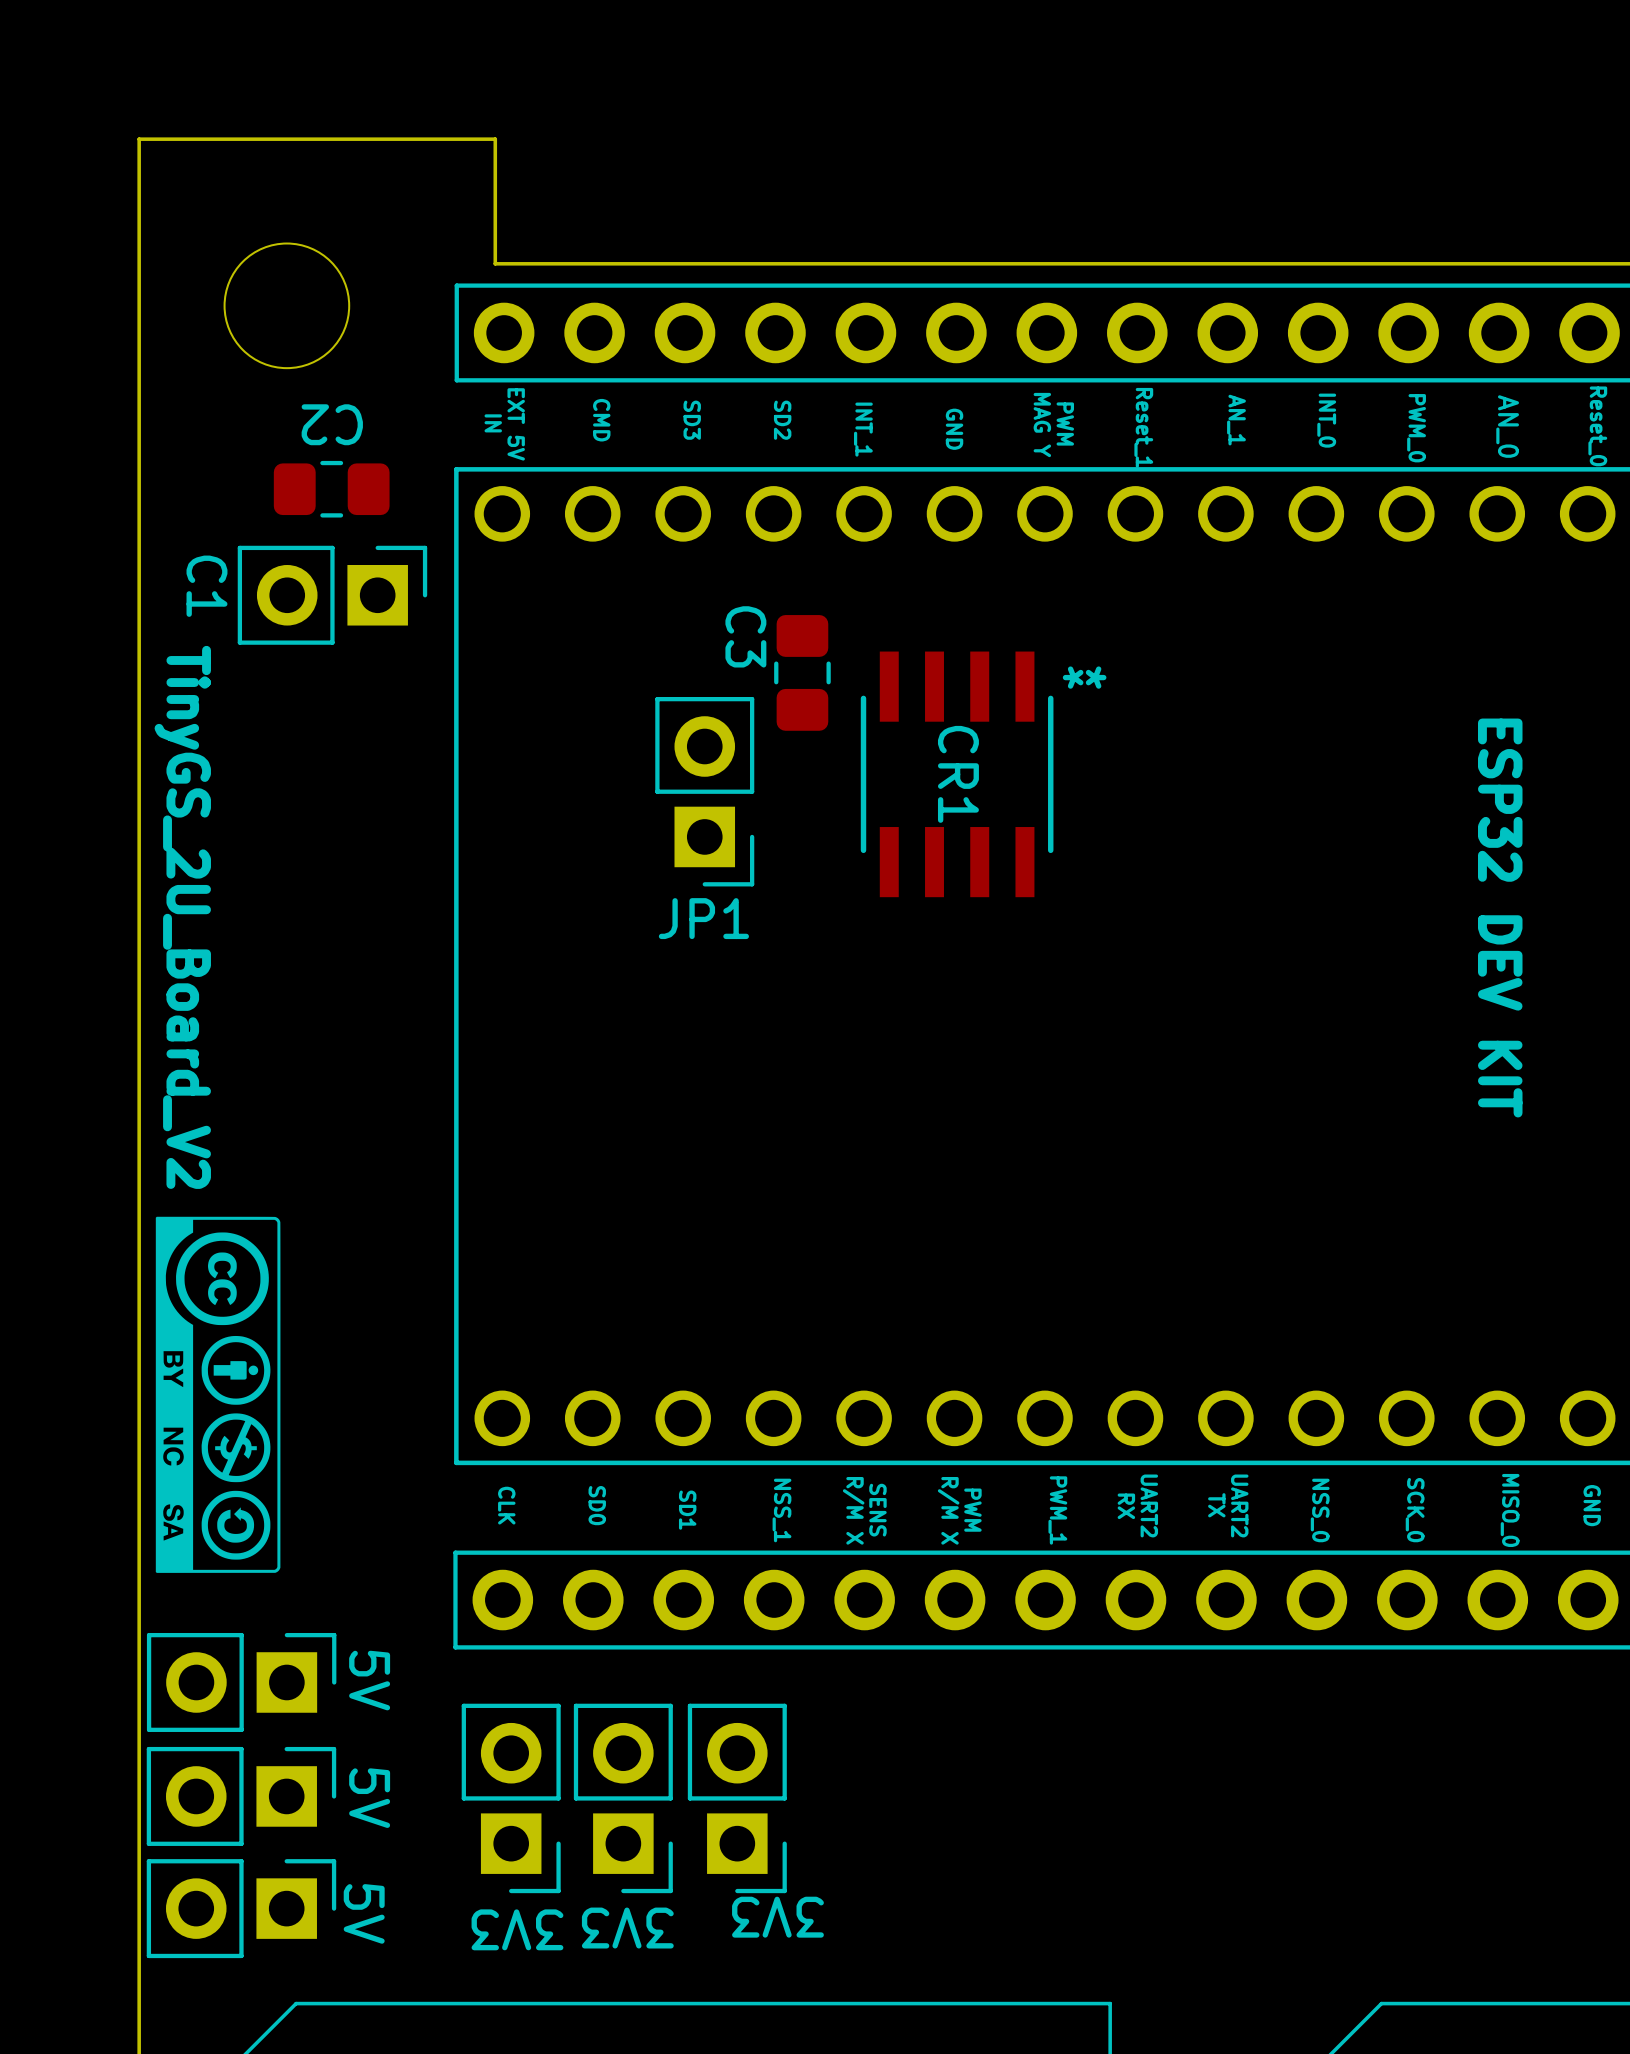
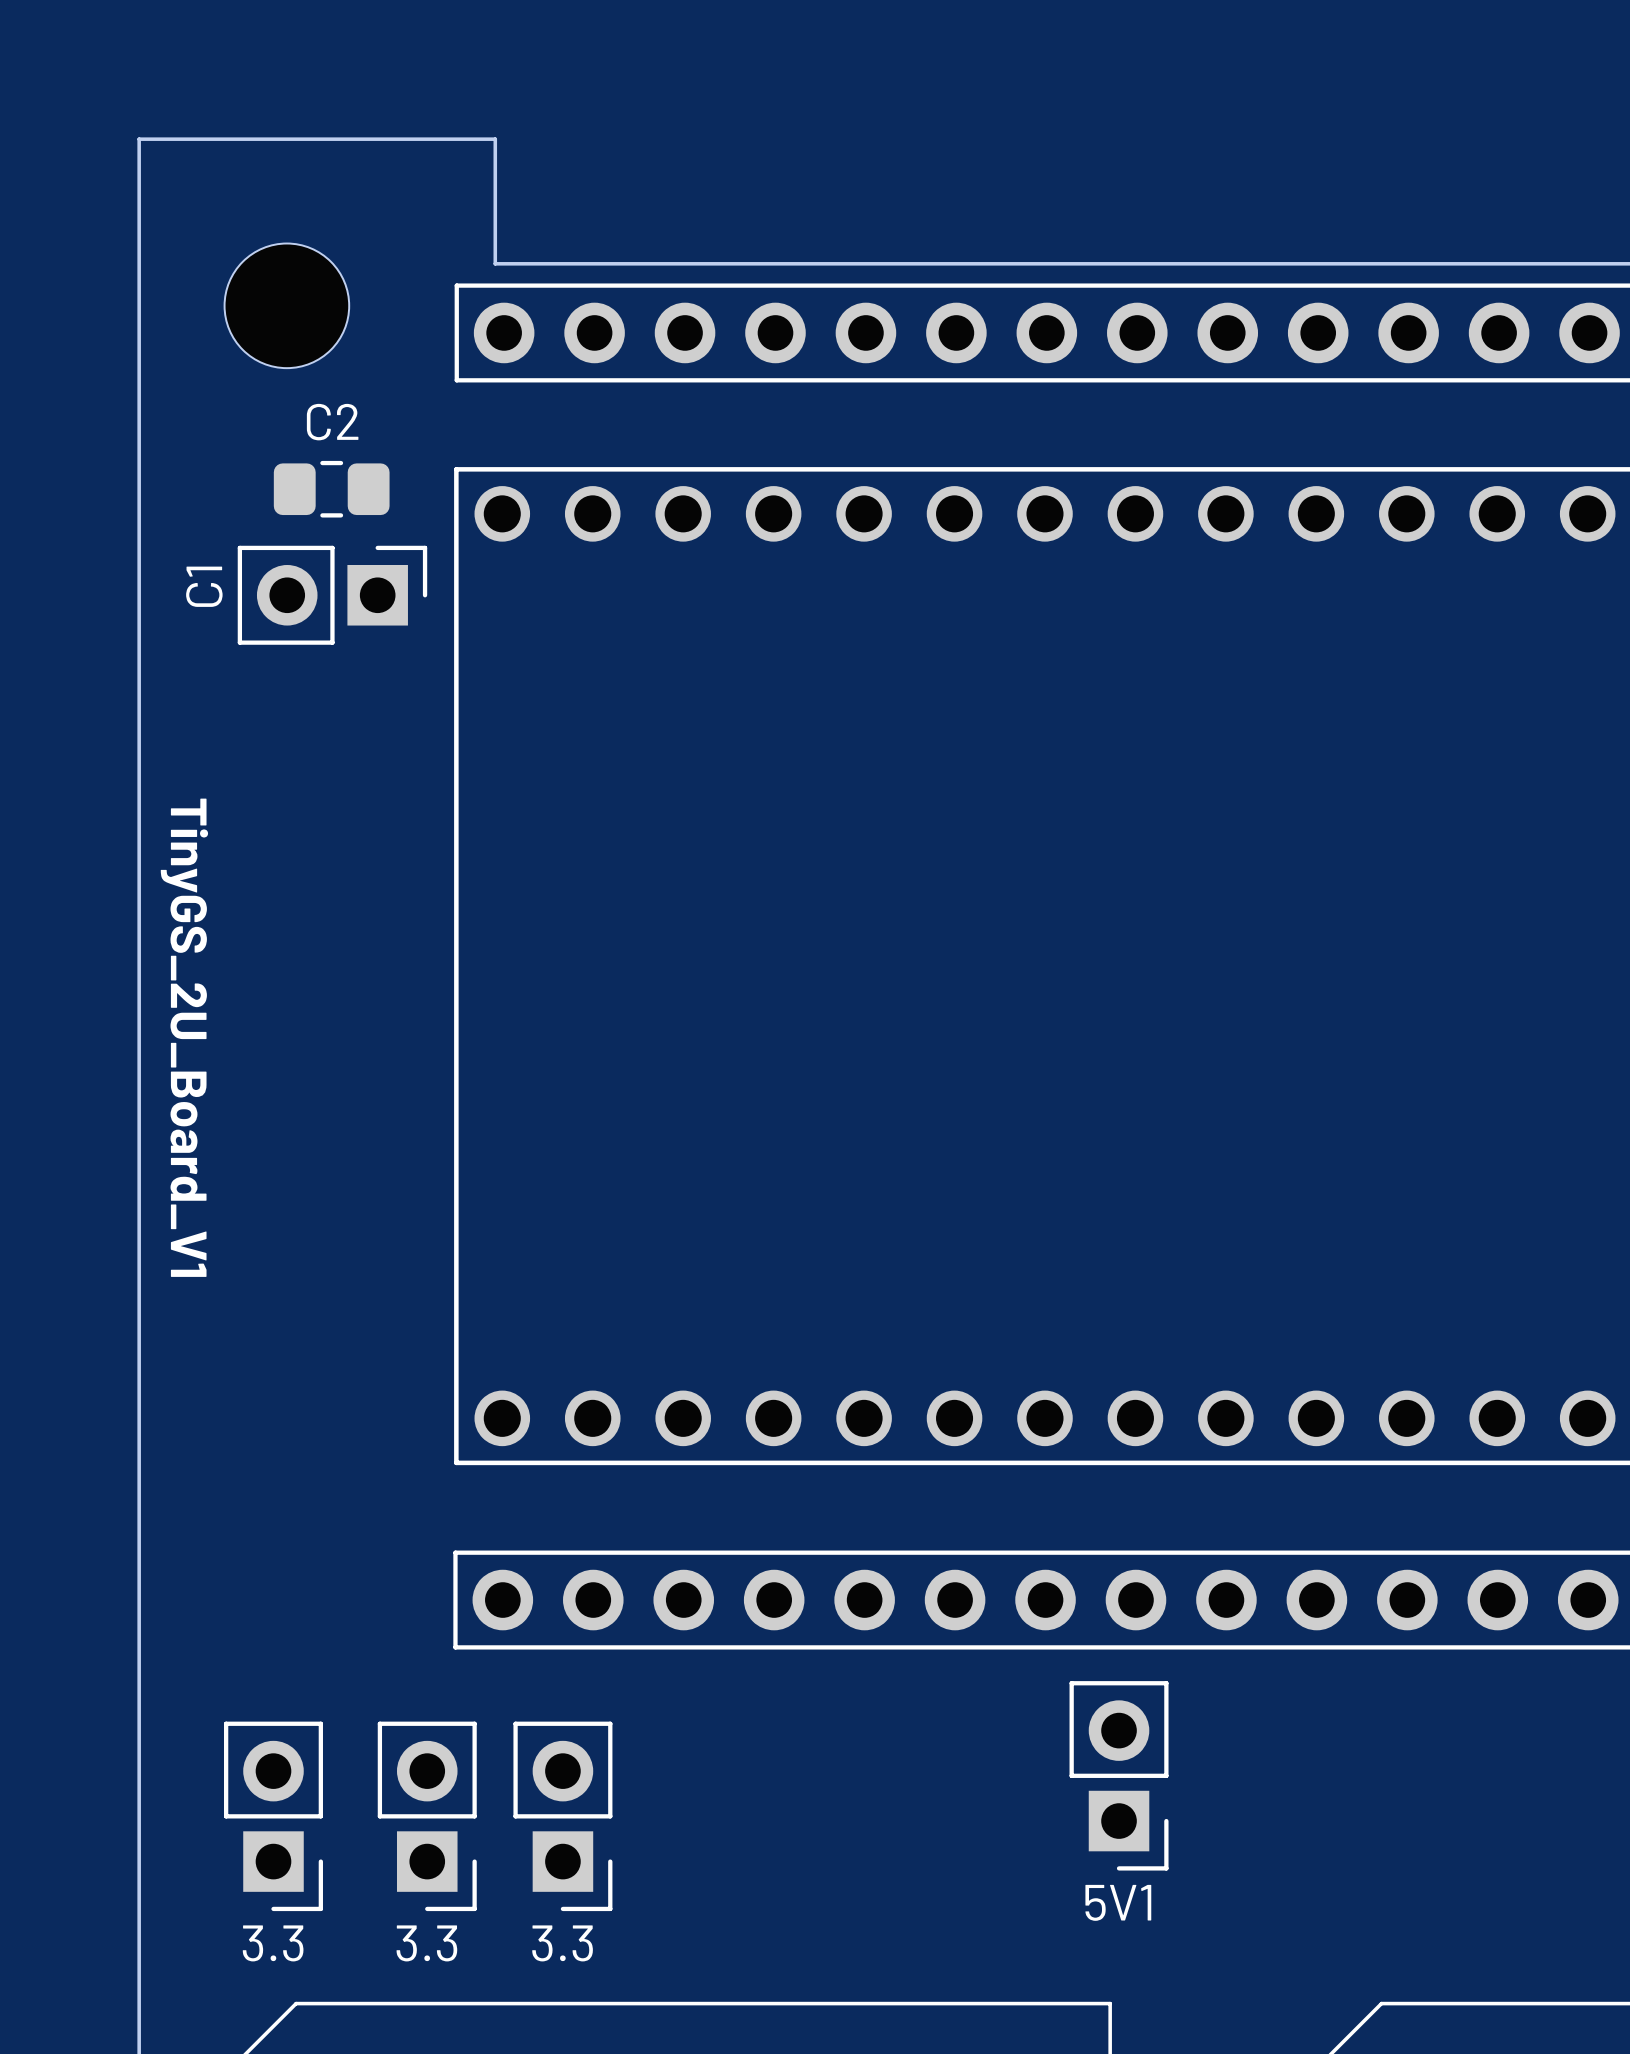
text: CMD (601, 420) -> none
text: SD3 (692, 420) -> none
text: SD2 (782, 420) -> none
text: AN_1 (1236, 420) -> none
text: INT_0 (1326, 420) -> none
text: IN (493, 423) -> none
text: PWM (1065, 423) -> none
C2 name rotation: 0° (332, 424) -> 180° (332, 422)
text: EXT 5V (516, 424) -> none
text: MAG Y (1042, 425) -> none
text: AN_0 (1507, 426) -> none
text: Reset_0 (1597, 426) -> none
text: Reset_1 (1143, 427) -> none
text: PWM_0 (1416, 428) -> none
text: INT_1 (863, 429) -> none
text: GND (954, 429) -> none
C1 name rotation: 0° (206, 586) -> 180° (204, 586)
C3: (802, 672) -> none
CR1: (957, 774) -> none
JP1: (704, 791) -> none
text: TinyGS_2U_Board_V2 (182, 917) -> TinyGS_2U_Board_V1 (184, 1037)
text: ESP32 DEV KIT (1500, 918) -> none
drawing: [155, 1216, 281, 1573] -> none
text: CLK (506, 1505) -> none
text: SD0 (597, 1505) -> none
text: UART2 (1149, 1505) -> none
text: TX (1216, 1505) -> none
text: UART2 (1239, 1505) -> none
text: GND (1592, 1505) -> none
text: RX (1126, 1506) -> none
text: SD1 (687, 1510) -> none
text: NSS_1 (781, 1510) -> none
text: R/M X (853, 1510) -> none
text: SENS (877, 1510) -> none
text: R/M X (948, 1510) -> none
text: PWM (972, 1510) -> none
text: PWM_1 (1057, 1510) -> none
text: NSS_0 (1320, 1510) -> none
text: SCK_0 (1415, 1510) -> none
text: MISO_0 (1510, 1510) -> none
text: 5V (369, 1680) -> none
part: (241, 1682) -> none
5V1: none -> (1119, 1775)
part: (241, 1796) -> none
text: 5V (369, 1798) -> none
part: (511, 1798) -> none
part: (623, 1798) -> none
part: (737, 1798) -> none
3.3: none -> (273, 1816)
3.3: none -> (427, 1816)
3.3: none -> (562, 1816)
part: (241, 1908) -> none
text: 5V (364, 1913) -> none
text: 3V3 (777, 1917) -> none
text: 3V3 (627, 1928) -> none
text: 3V3 (517, 1929) -> none

